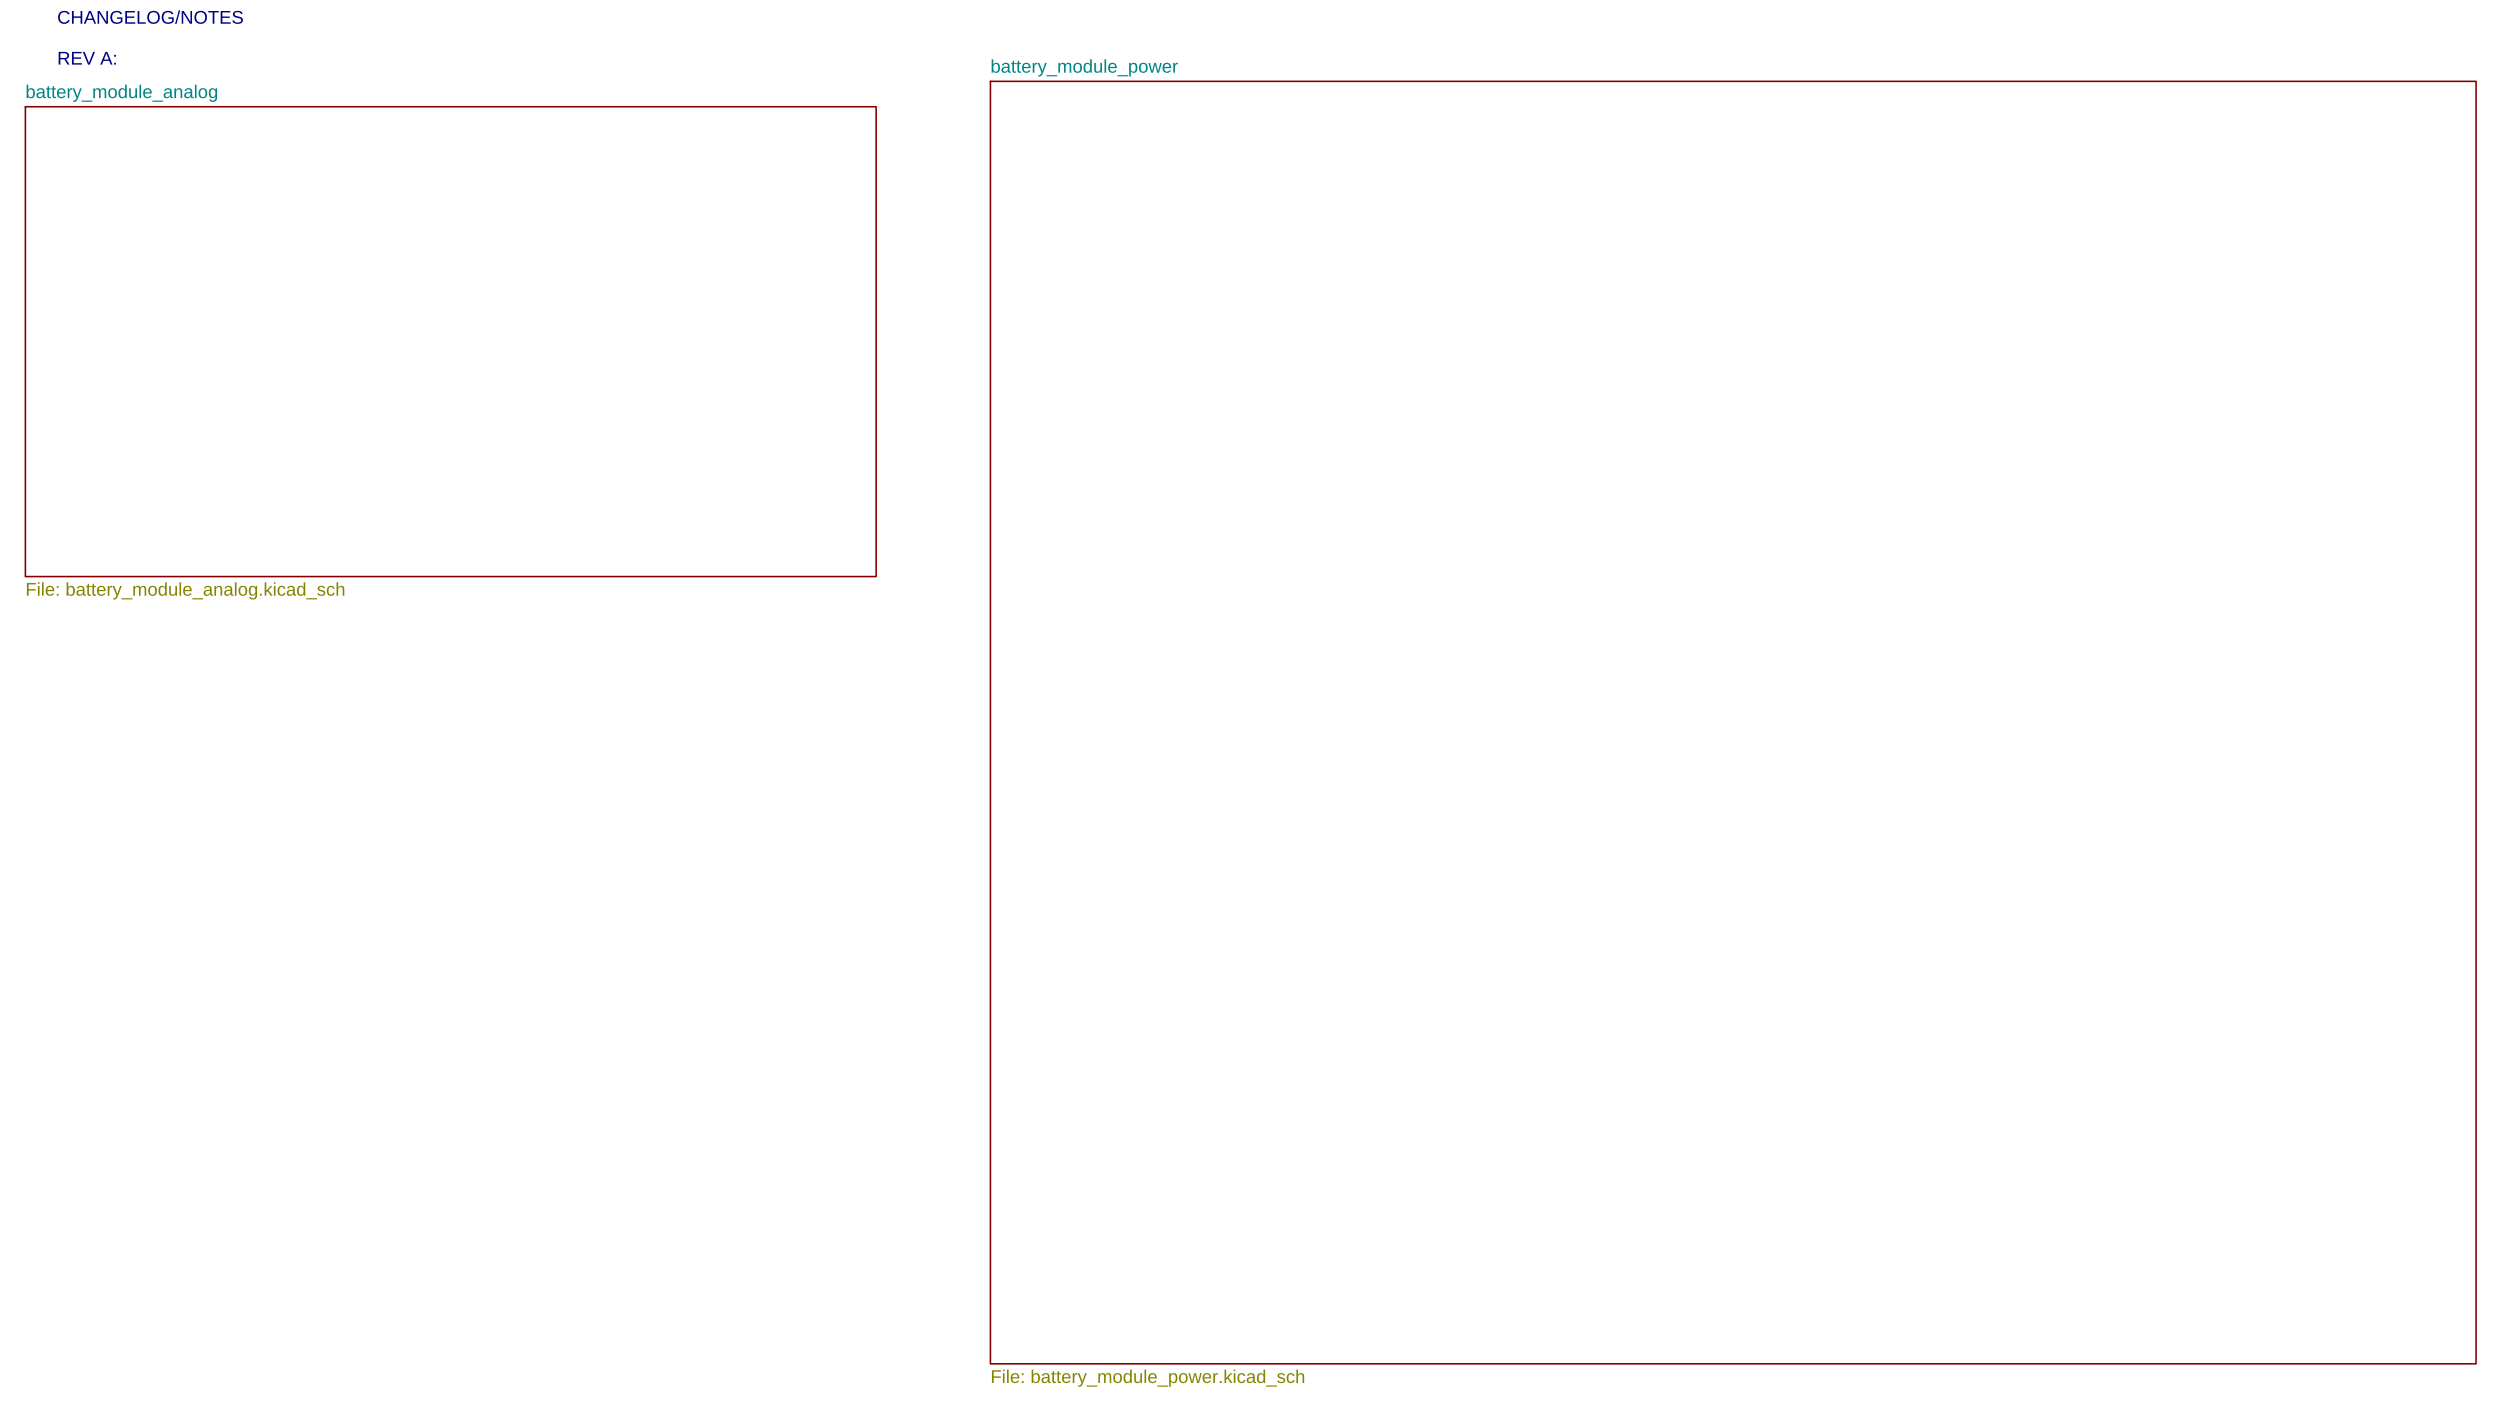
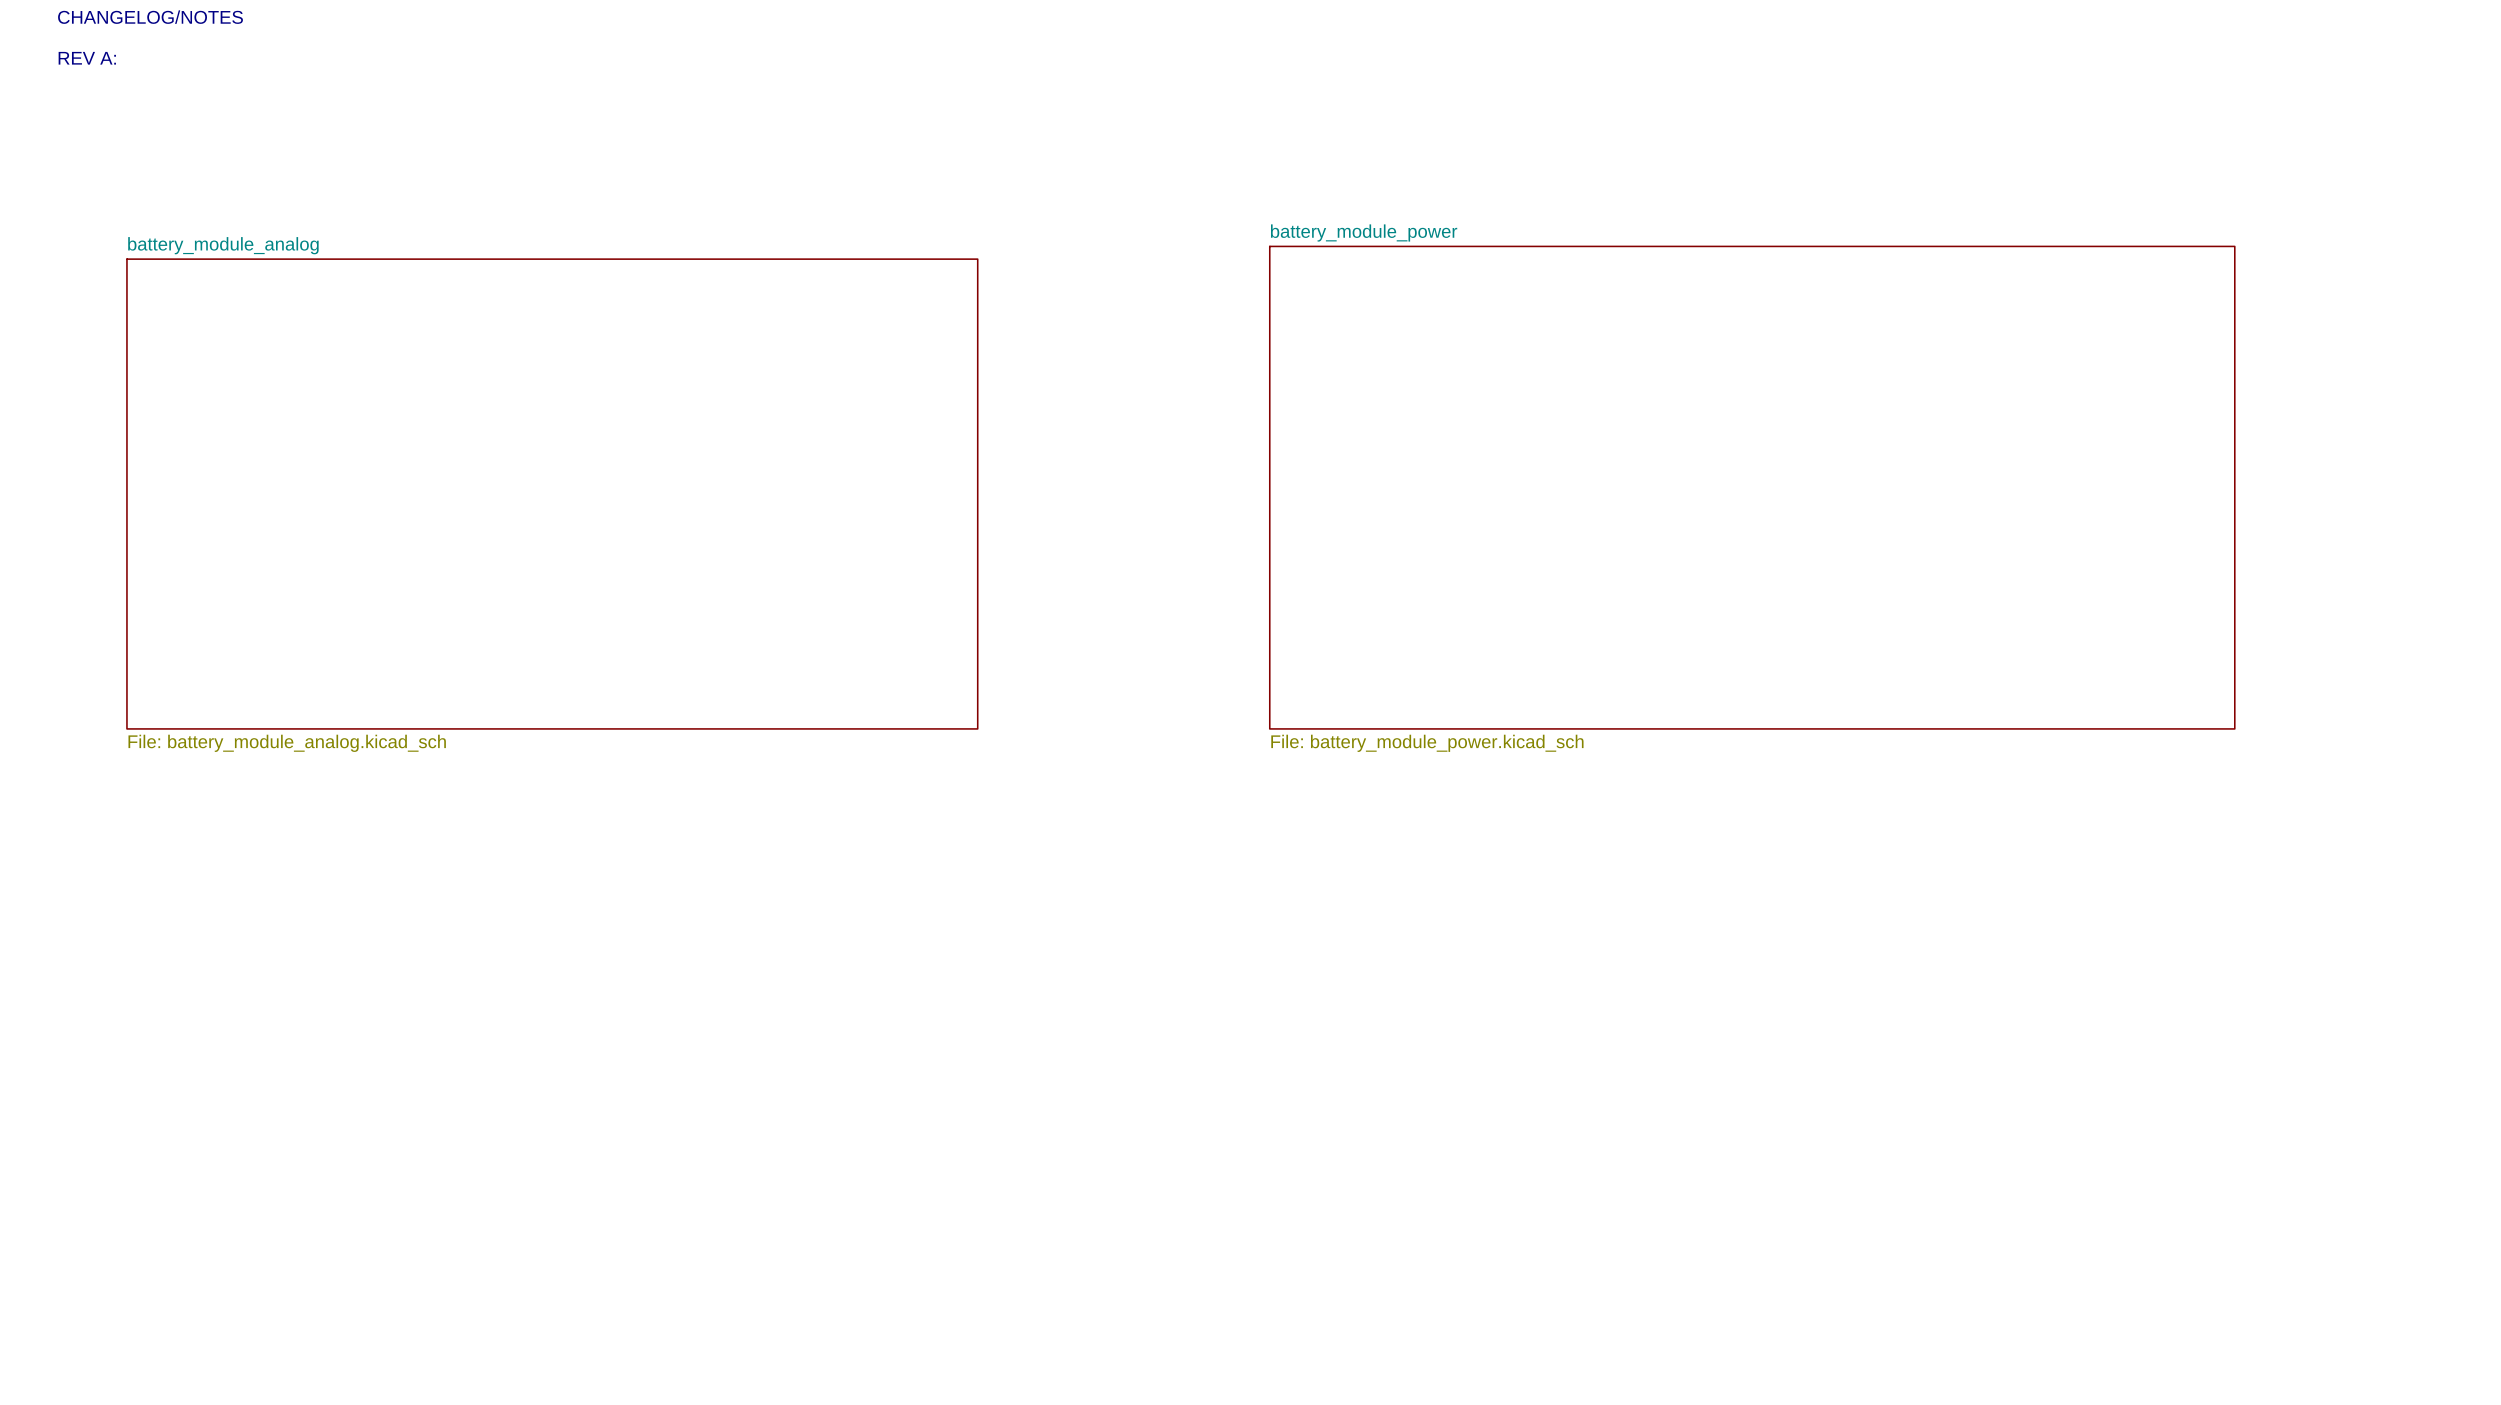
sheet battery_module_analog position: (450, 341) -> (552, 494)
sheet battery_module_power: none -> File: battery_module_power.kicad_sch (1752, 487)
sheet battery_module_power: File: battery_module_power.kicad_sch (1733, 722) -> none

